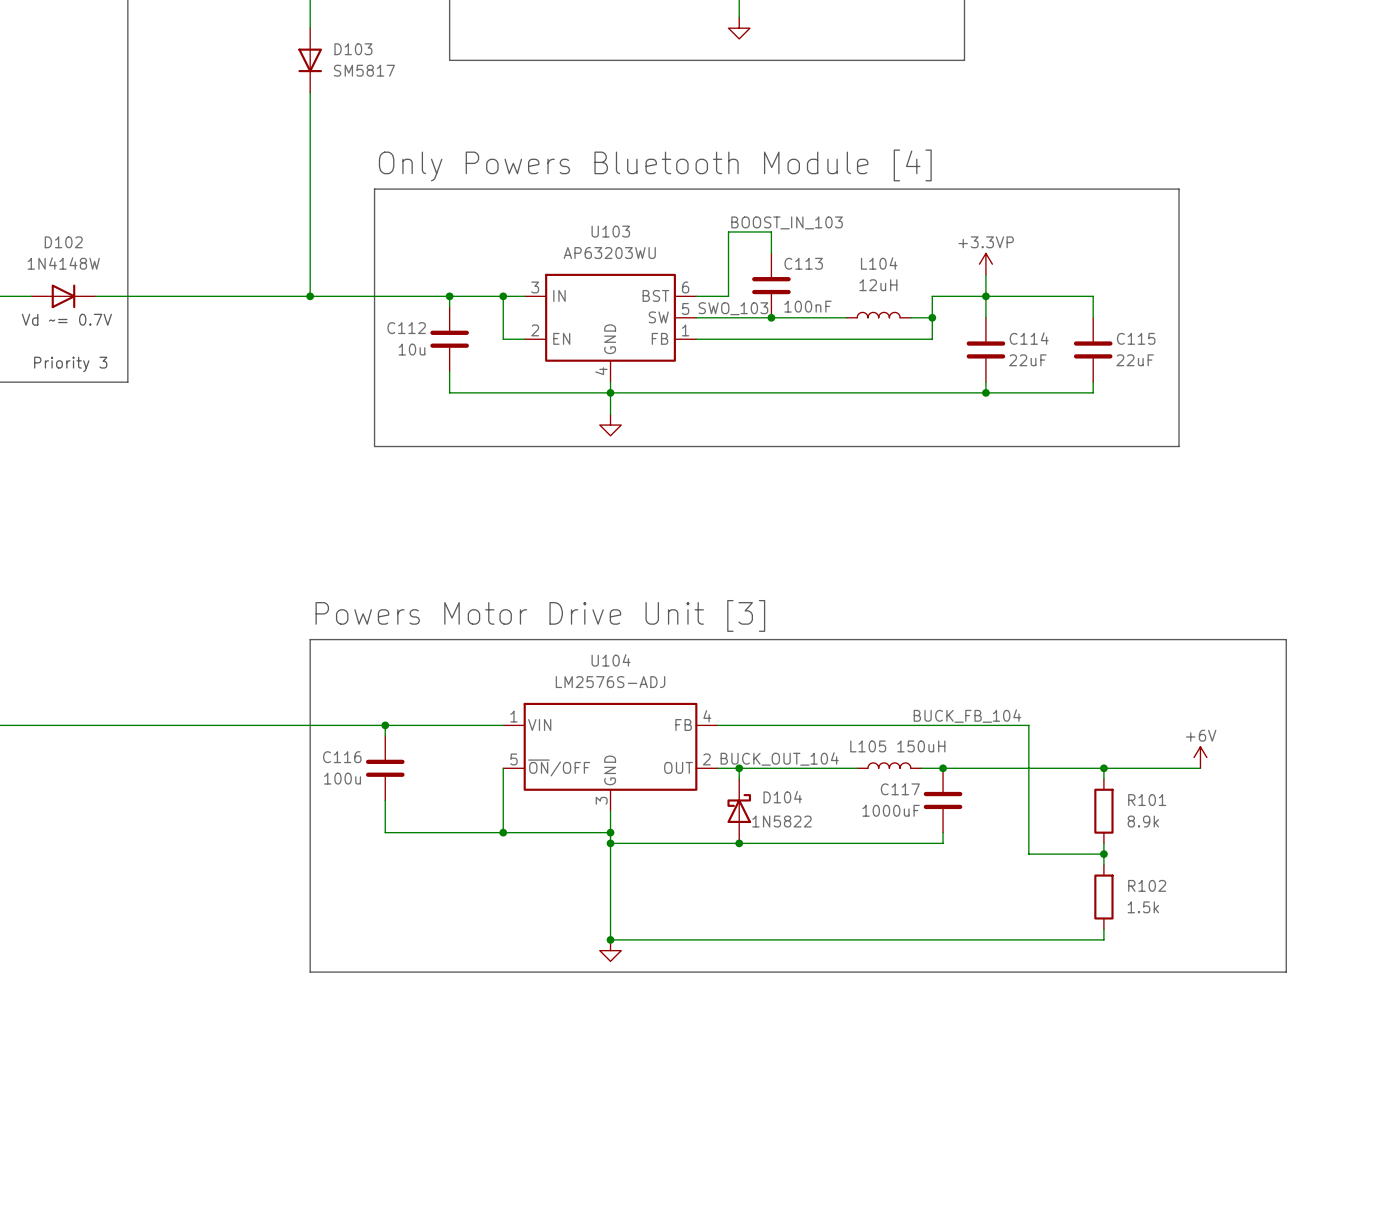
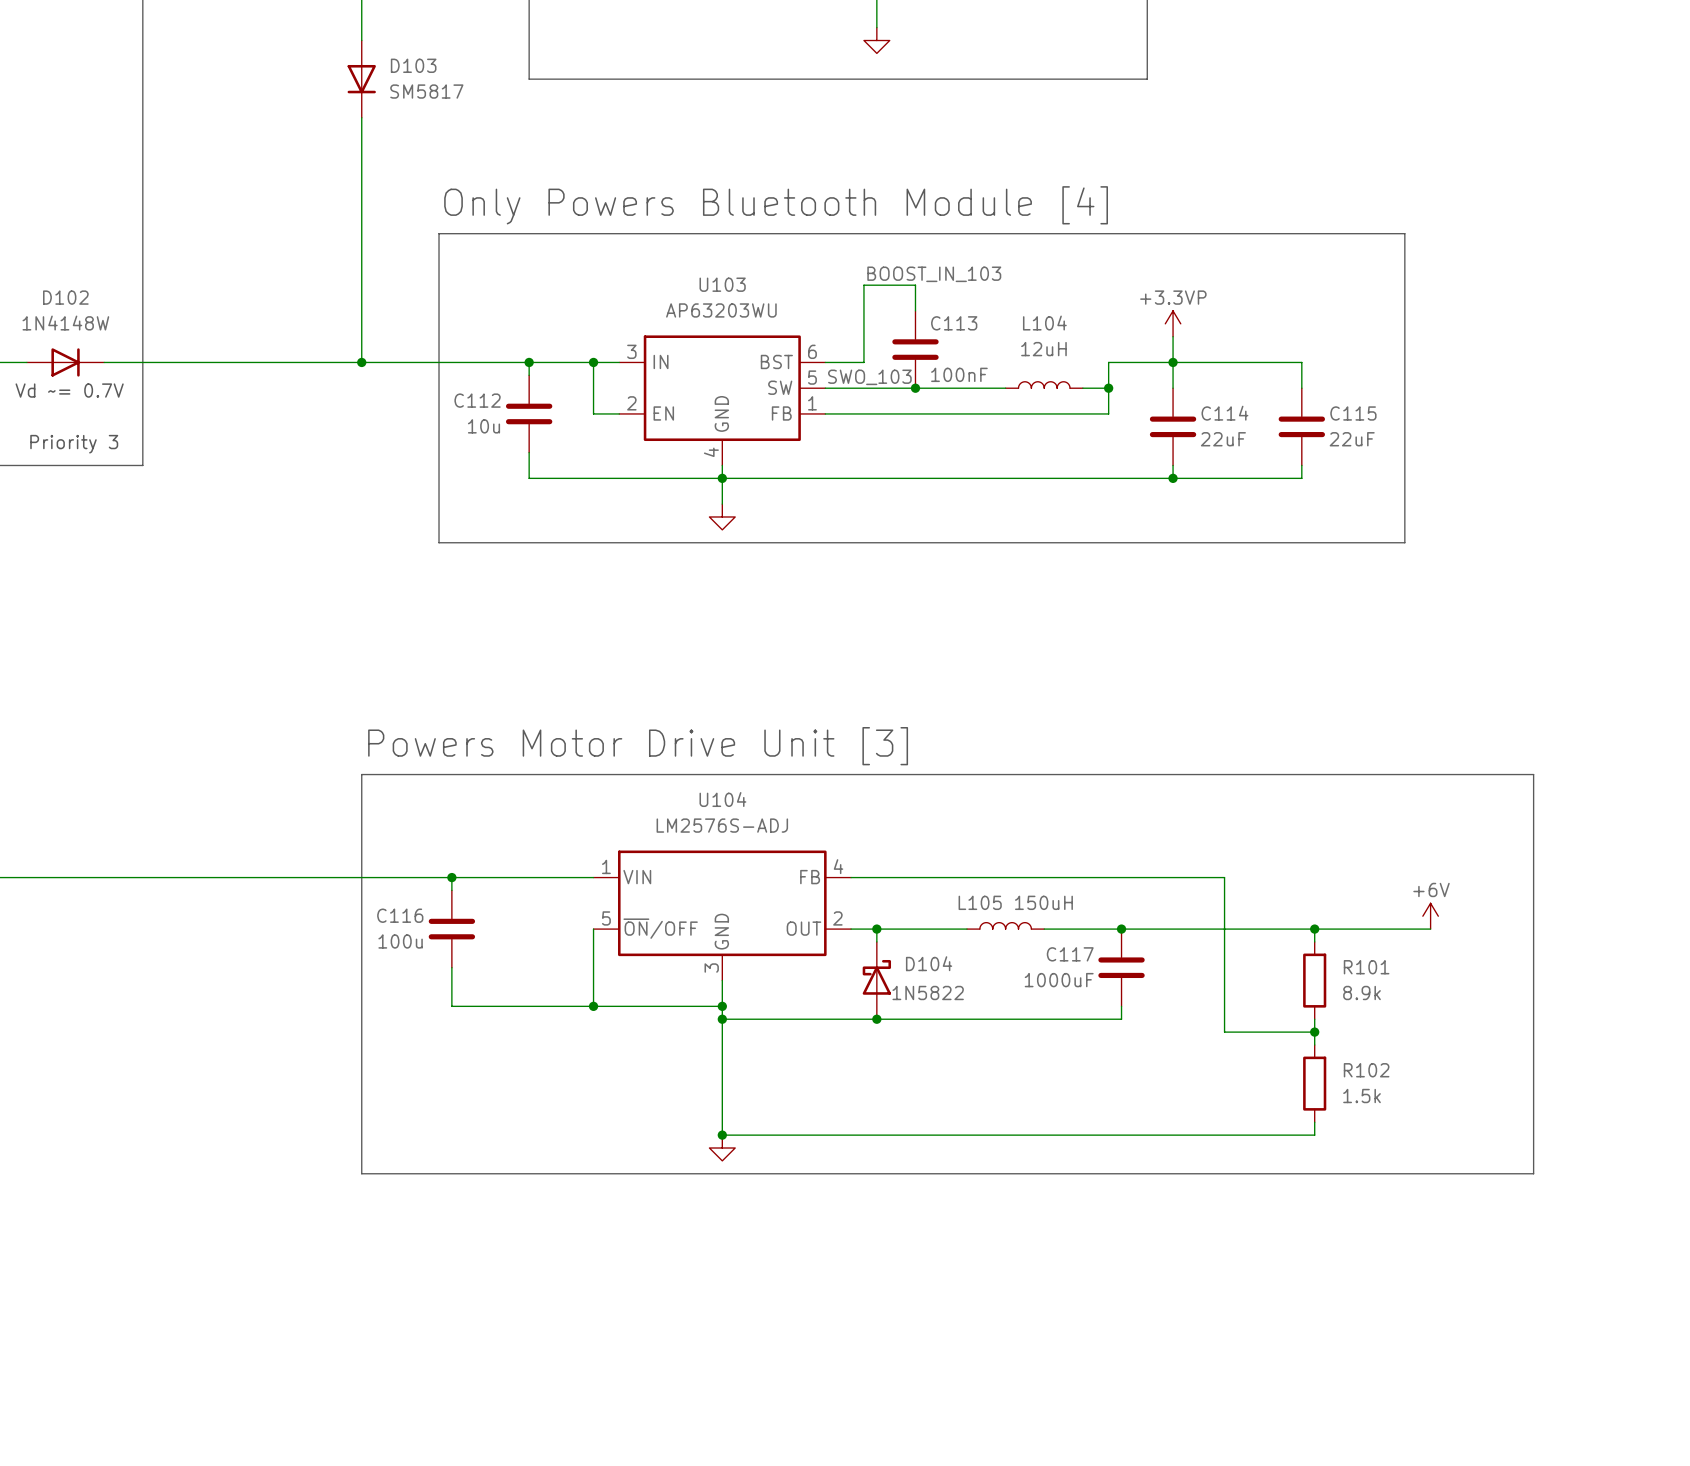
label: BUCK_FB_104 (967, 716) -> none
label: BUCK_OUT_104 (779, 758) -> none
L105 position: (889, 765) -> (1005, 925)
wire: (814, 768) (857, 768) -> (1044, 929) (1095, 929)

